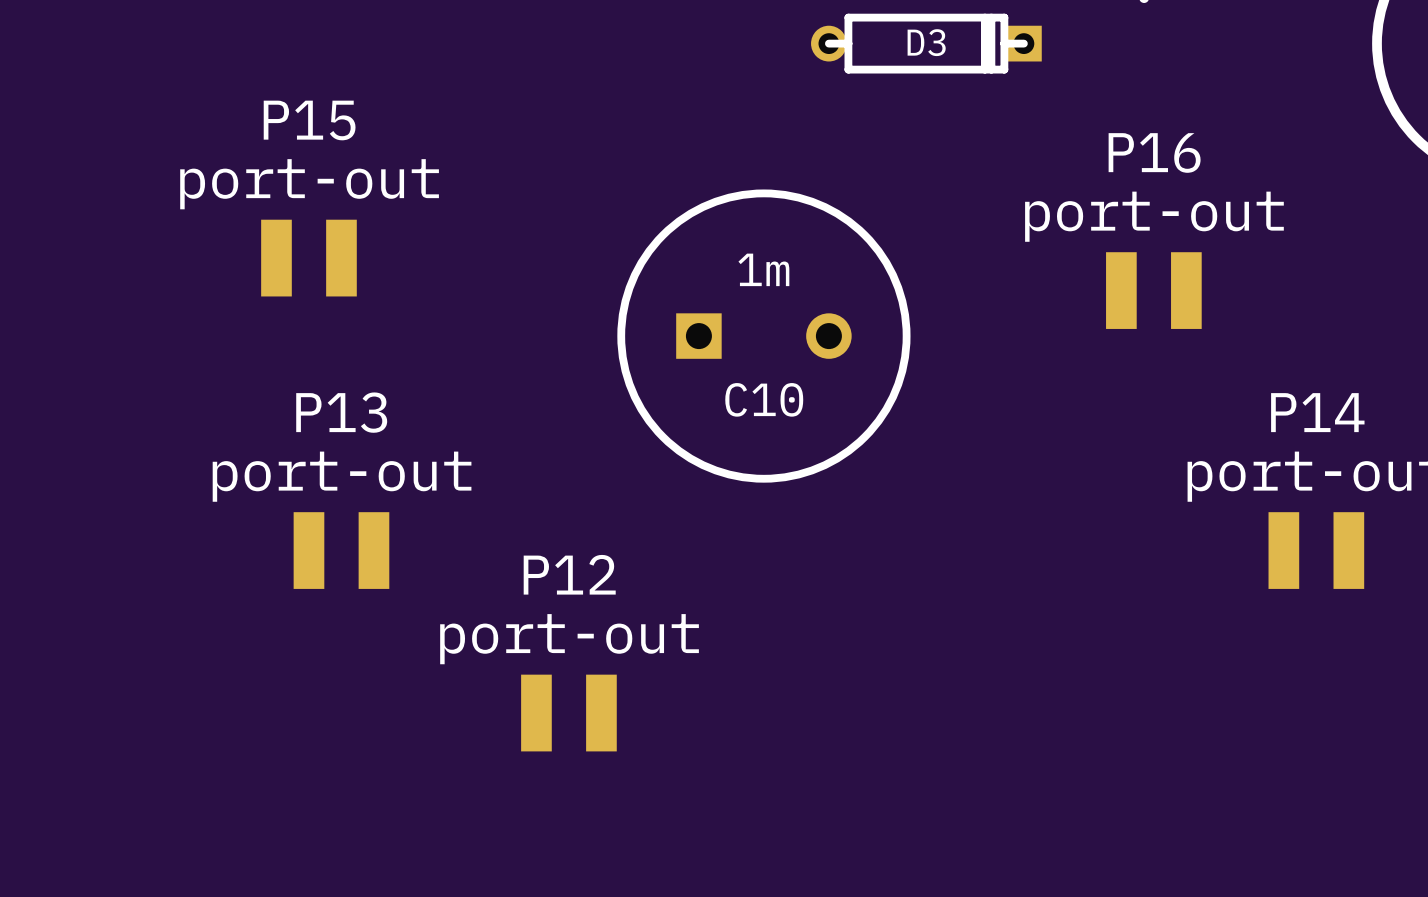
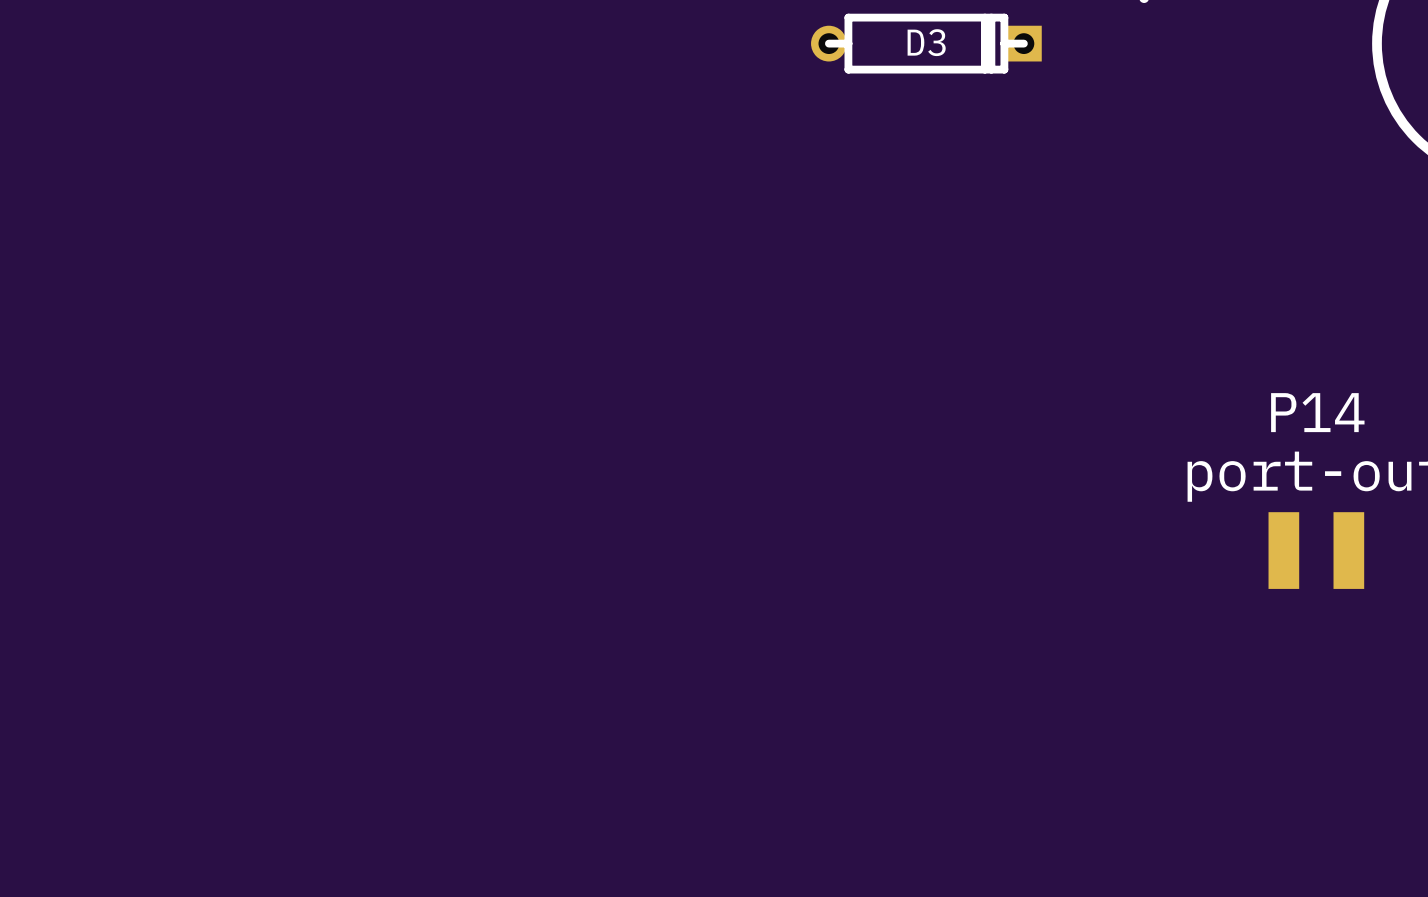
P15: port-out (308, 258) -> none
P16: port-out (1153, 290) -> none
C10: 1m (763, 336) -> none
P13: port-out (341, 550) -> none
P12: port-out (568, 713) -> none

